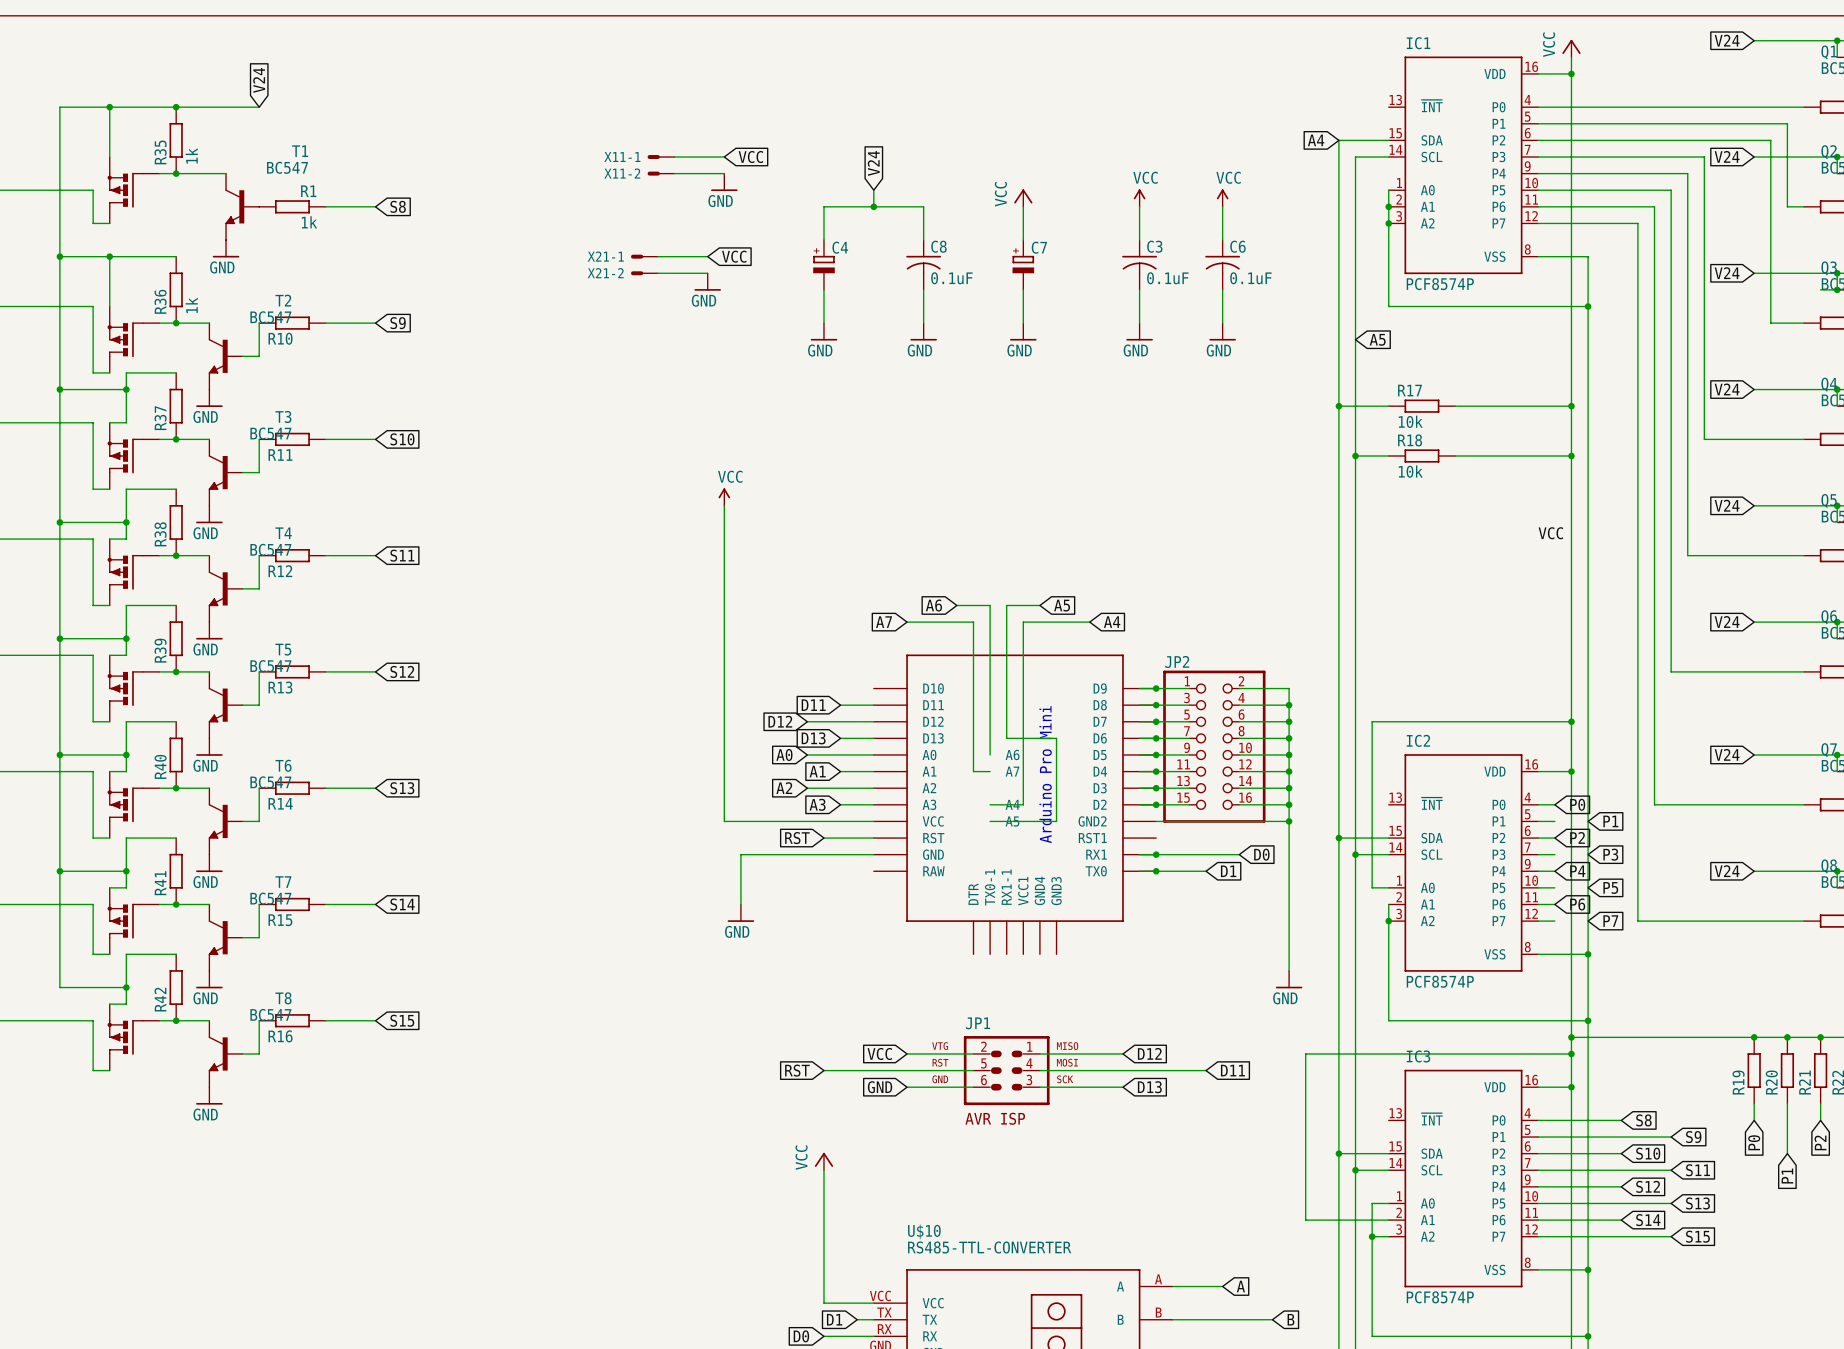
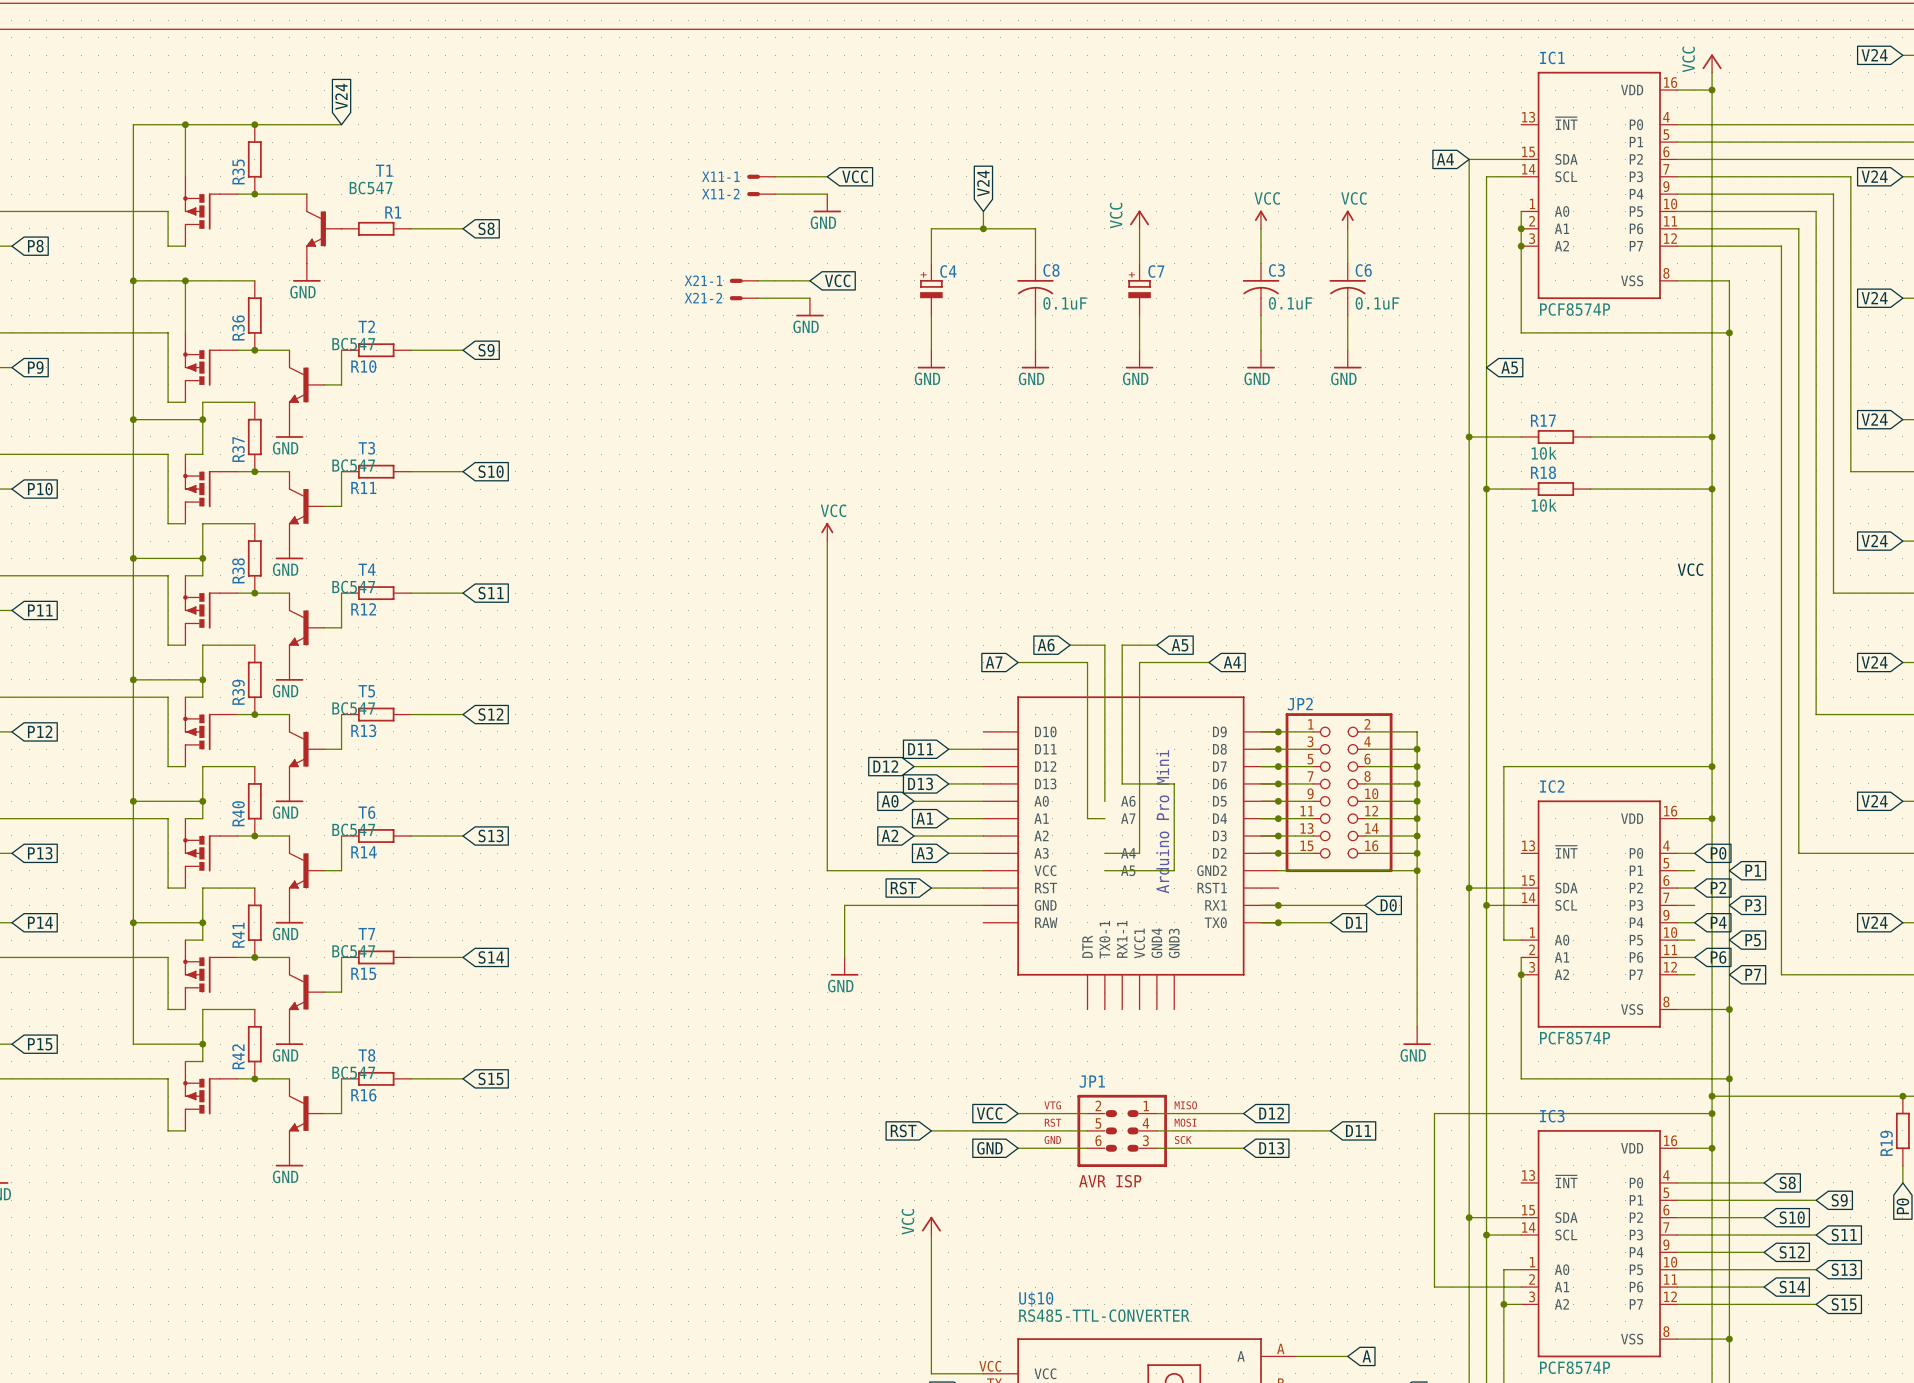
R35 value: 1k (191, 155) -> none
R1 value: 1k (309, 222) -> none
R36 value: 1k (191, 305) -> none

